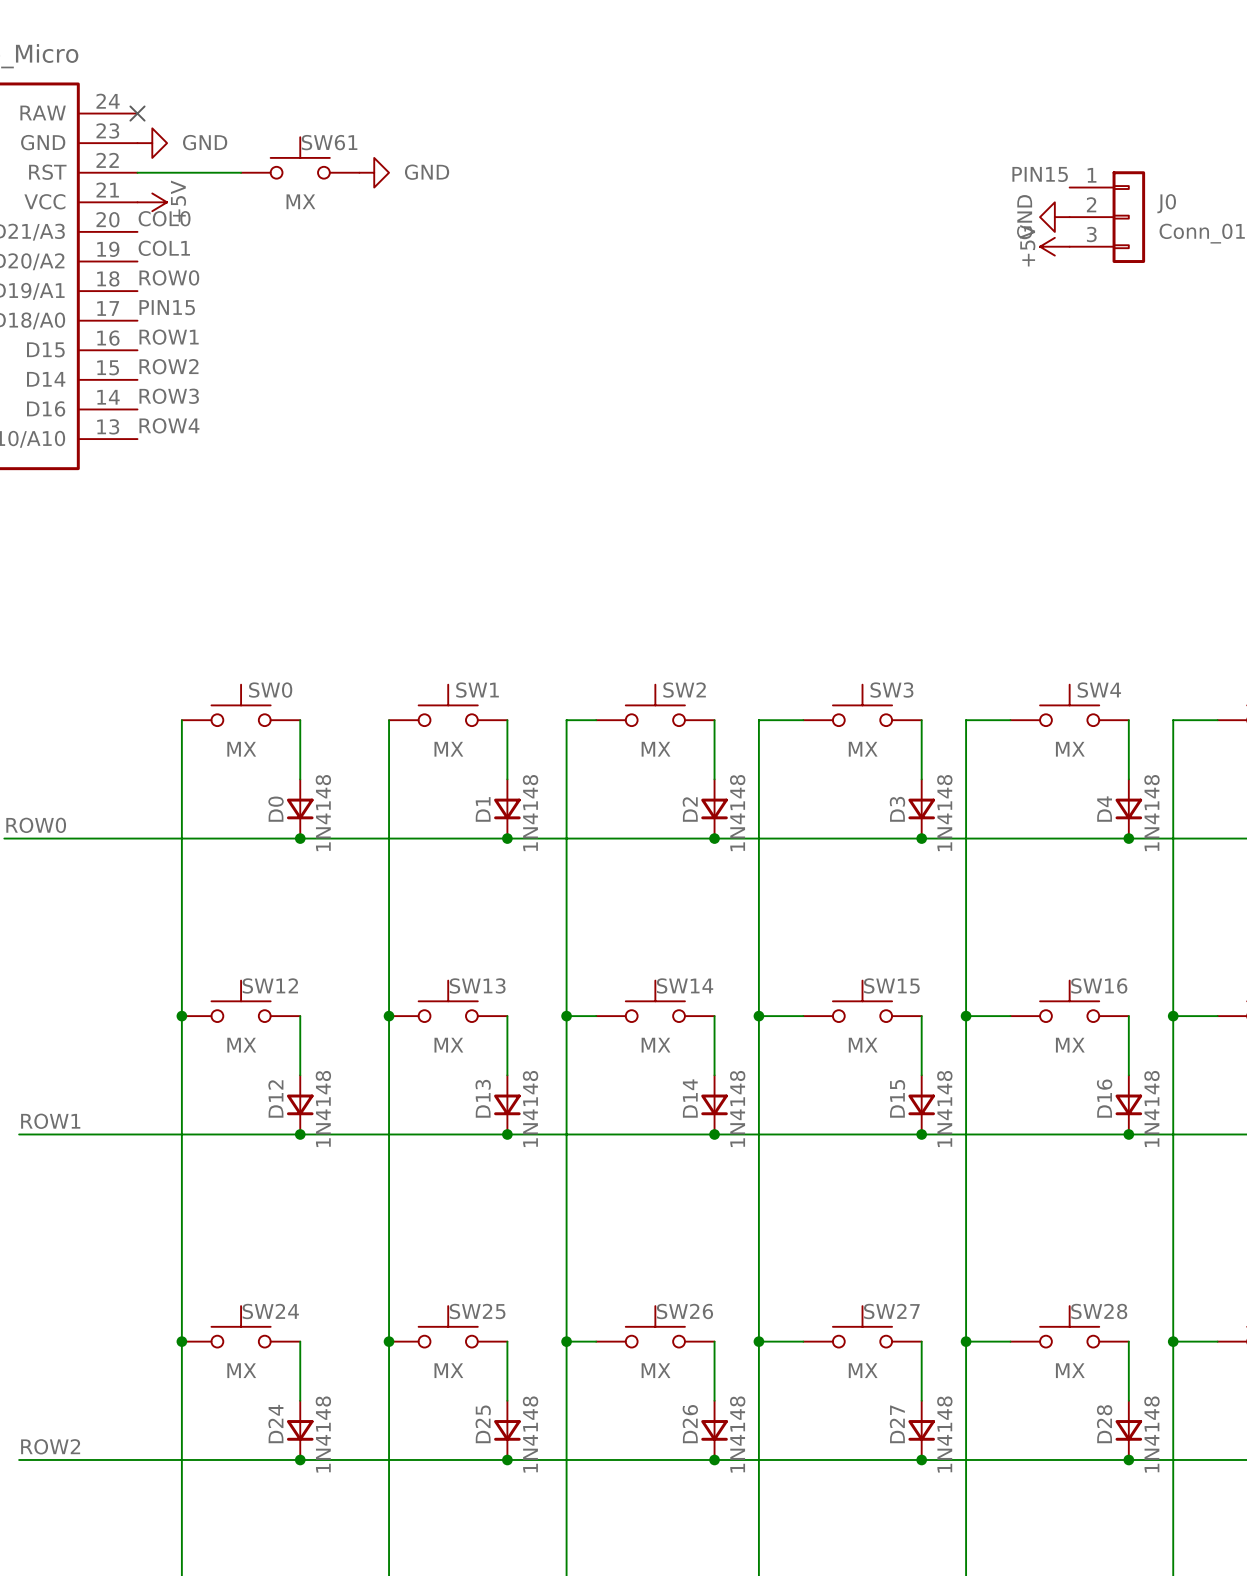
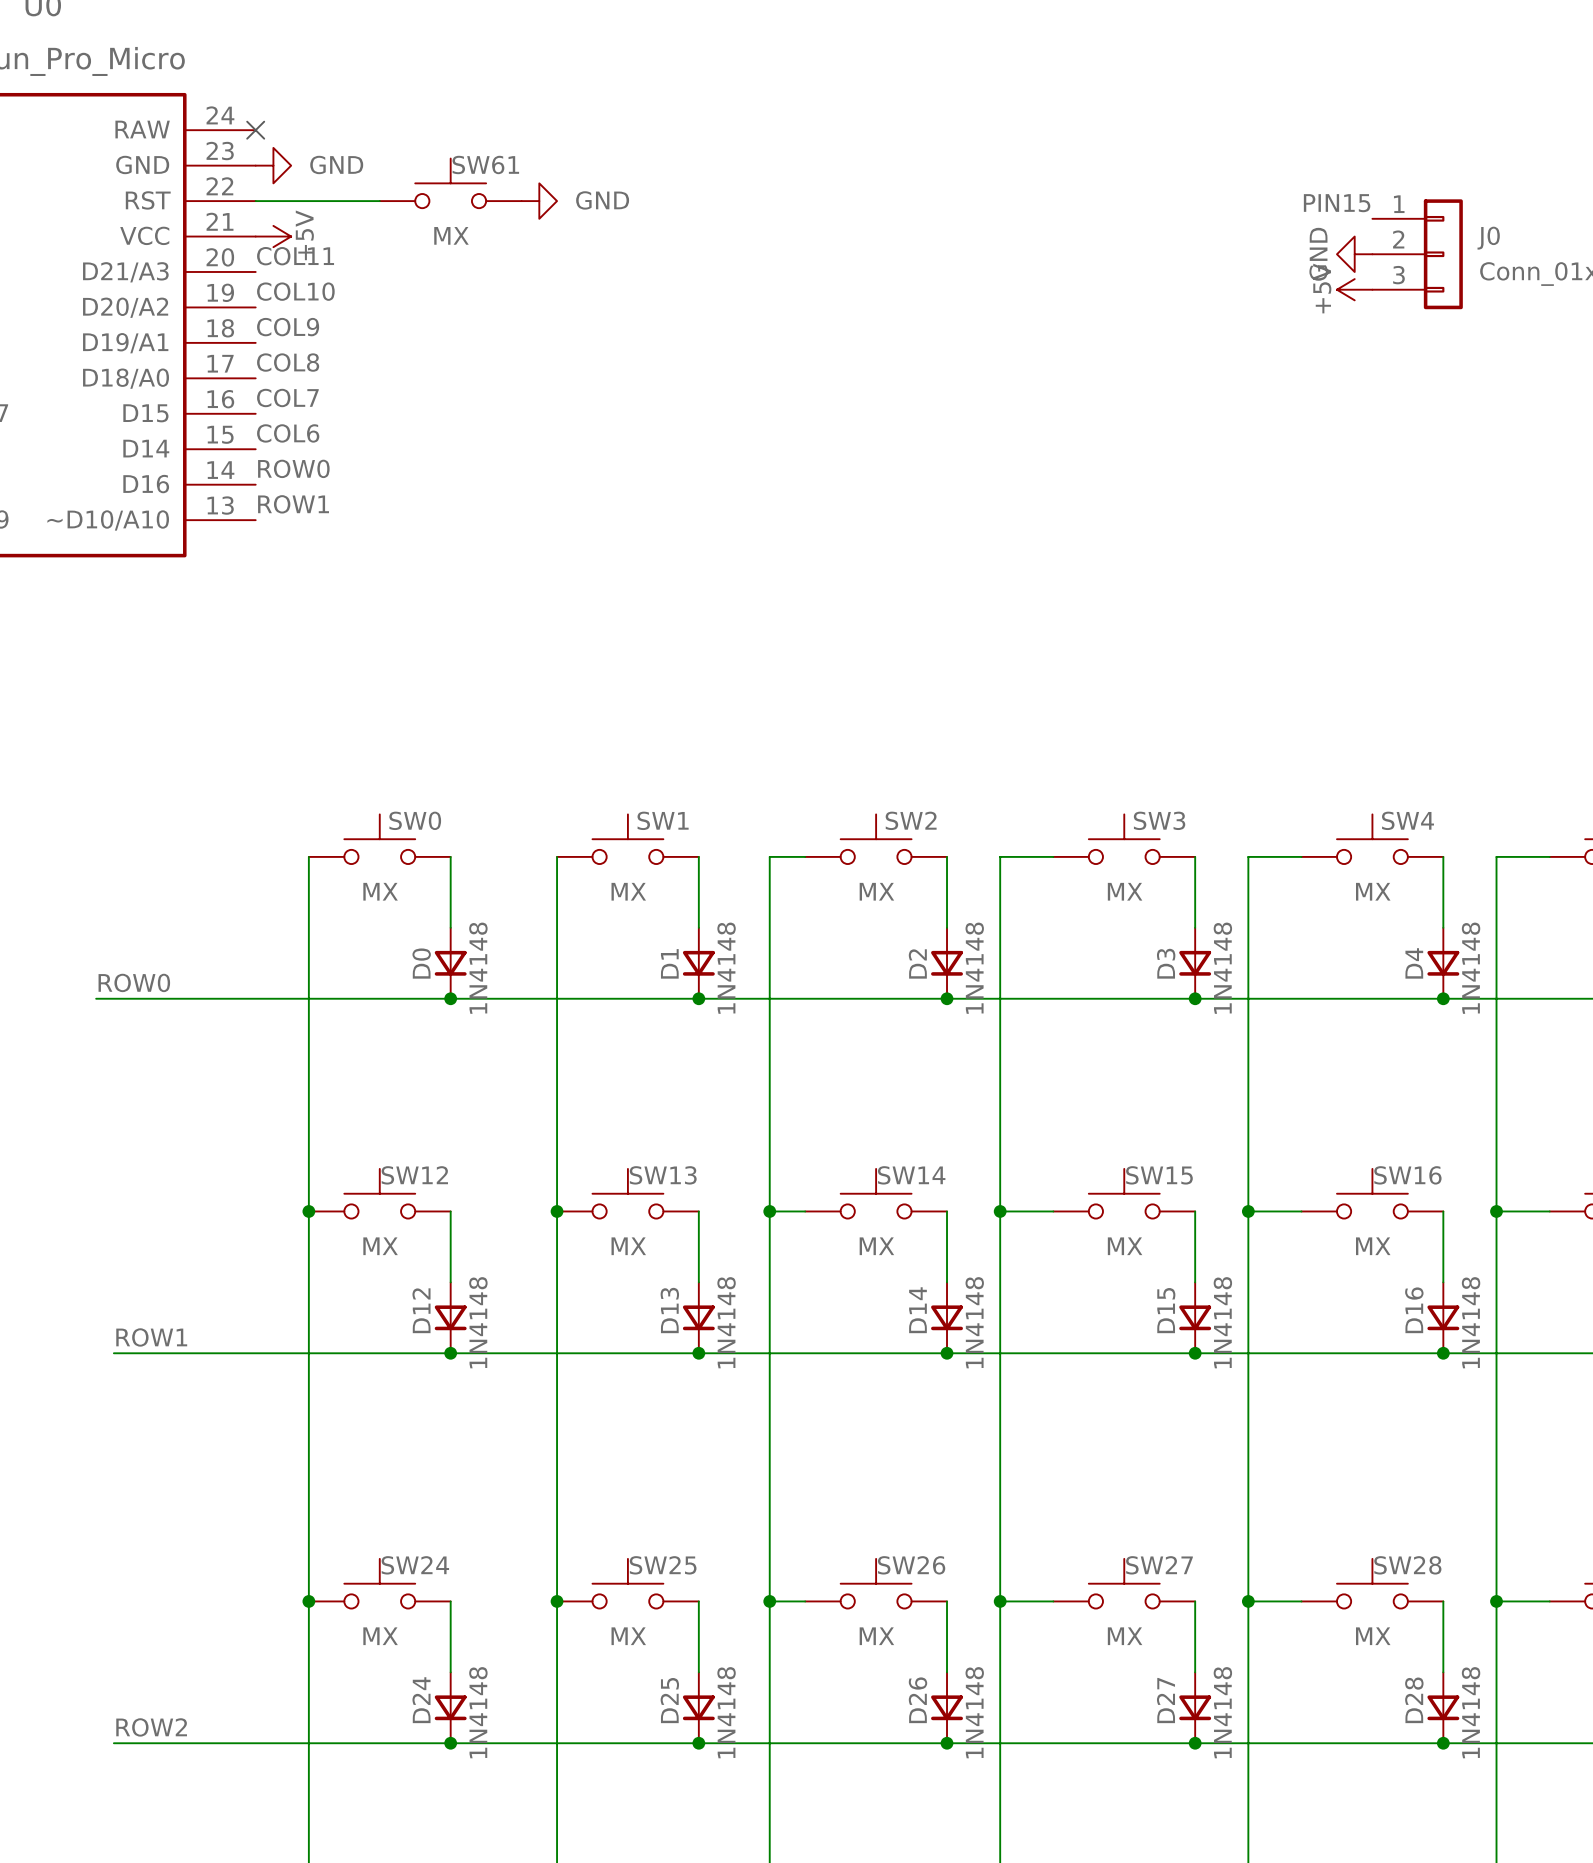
label: COL0 (164, 218) -> COL11 (295, 256)
label: COL1 (164, 248) -> COL10 (295, 291)
label: ROW0 (169, 277) -> COL9 (288, 327)
label: PIN15 (167, 307) -> COL8 (288, 362)
label: ROW1 (169, 337) -> COL7 (287, 397)
label: ROW2 (169, 366) -> COL6 (288, 433)
label: ROW3 (169, 396) -> ROW0 (293, 468)
label: ROW4 (169, 425) -> ROW1 (293, 504)

